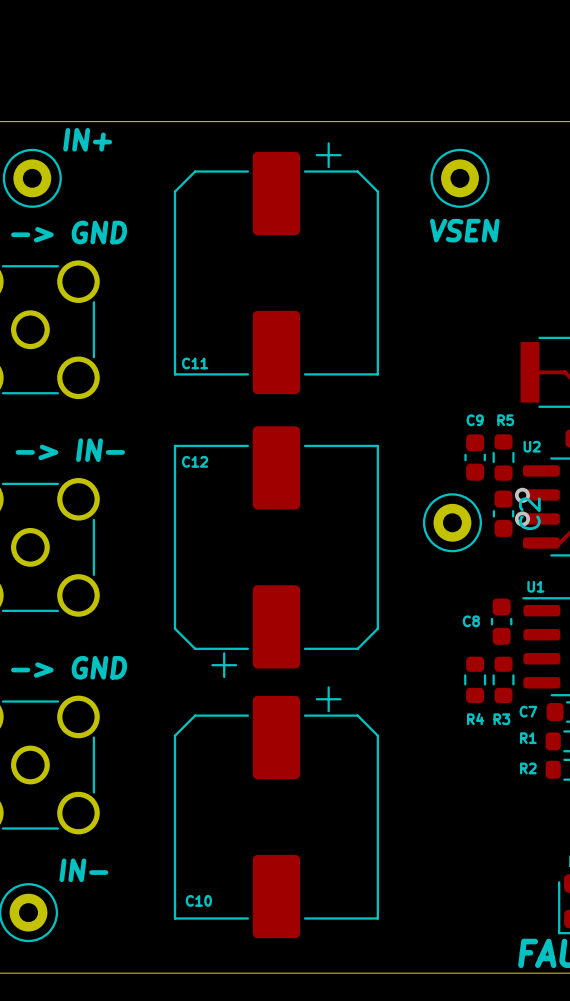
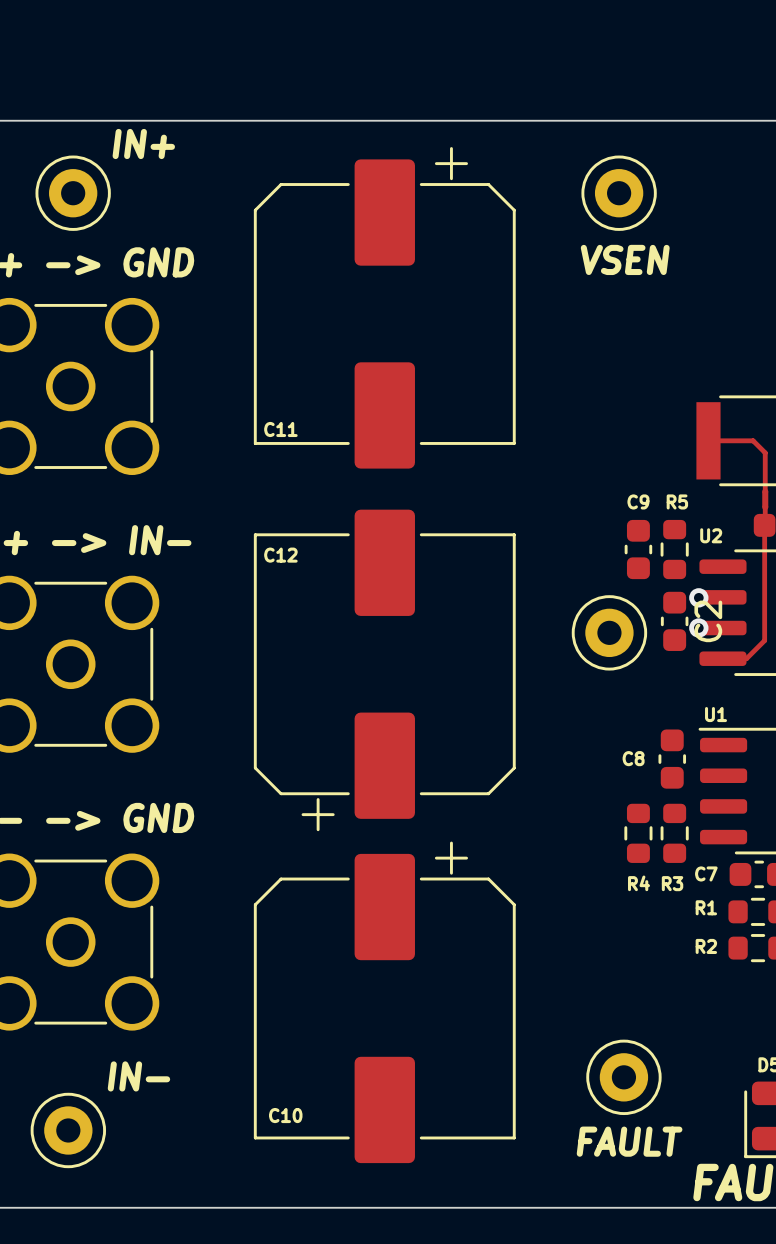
part: none -> (623, 1077)
text: none -> FAULT (629, 1141)

